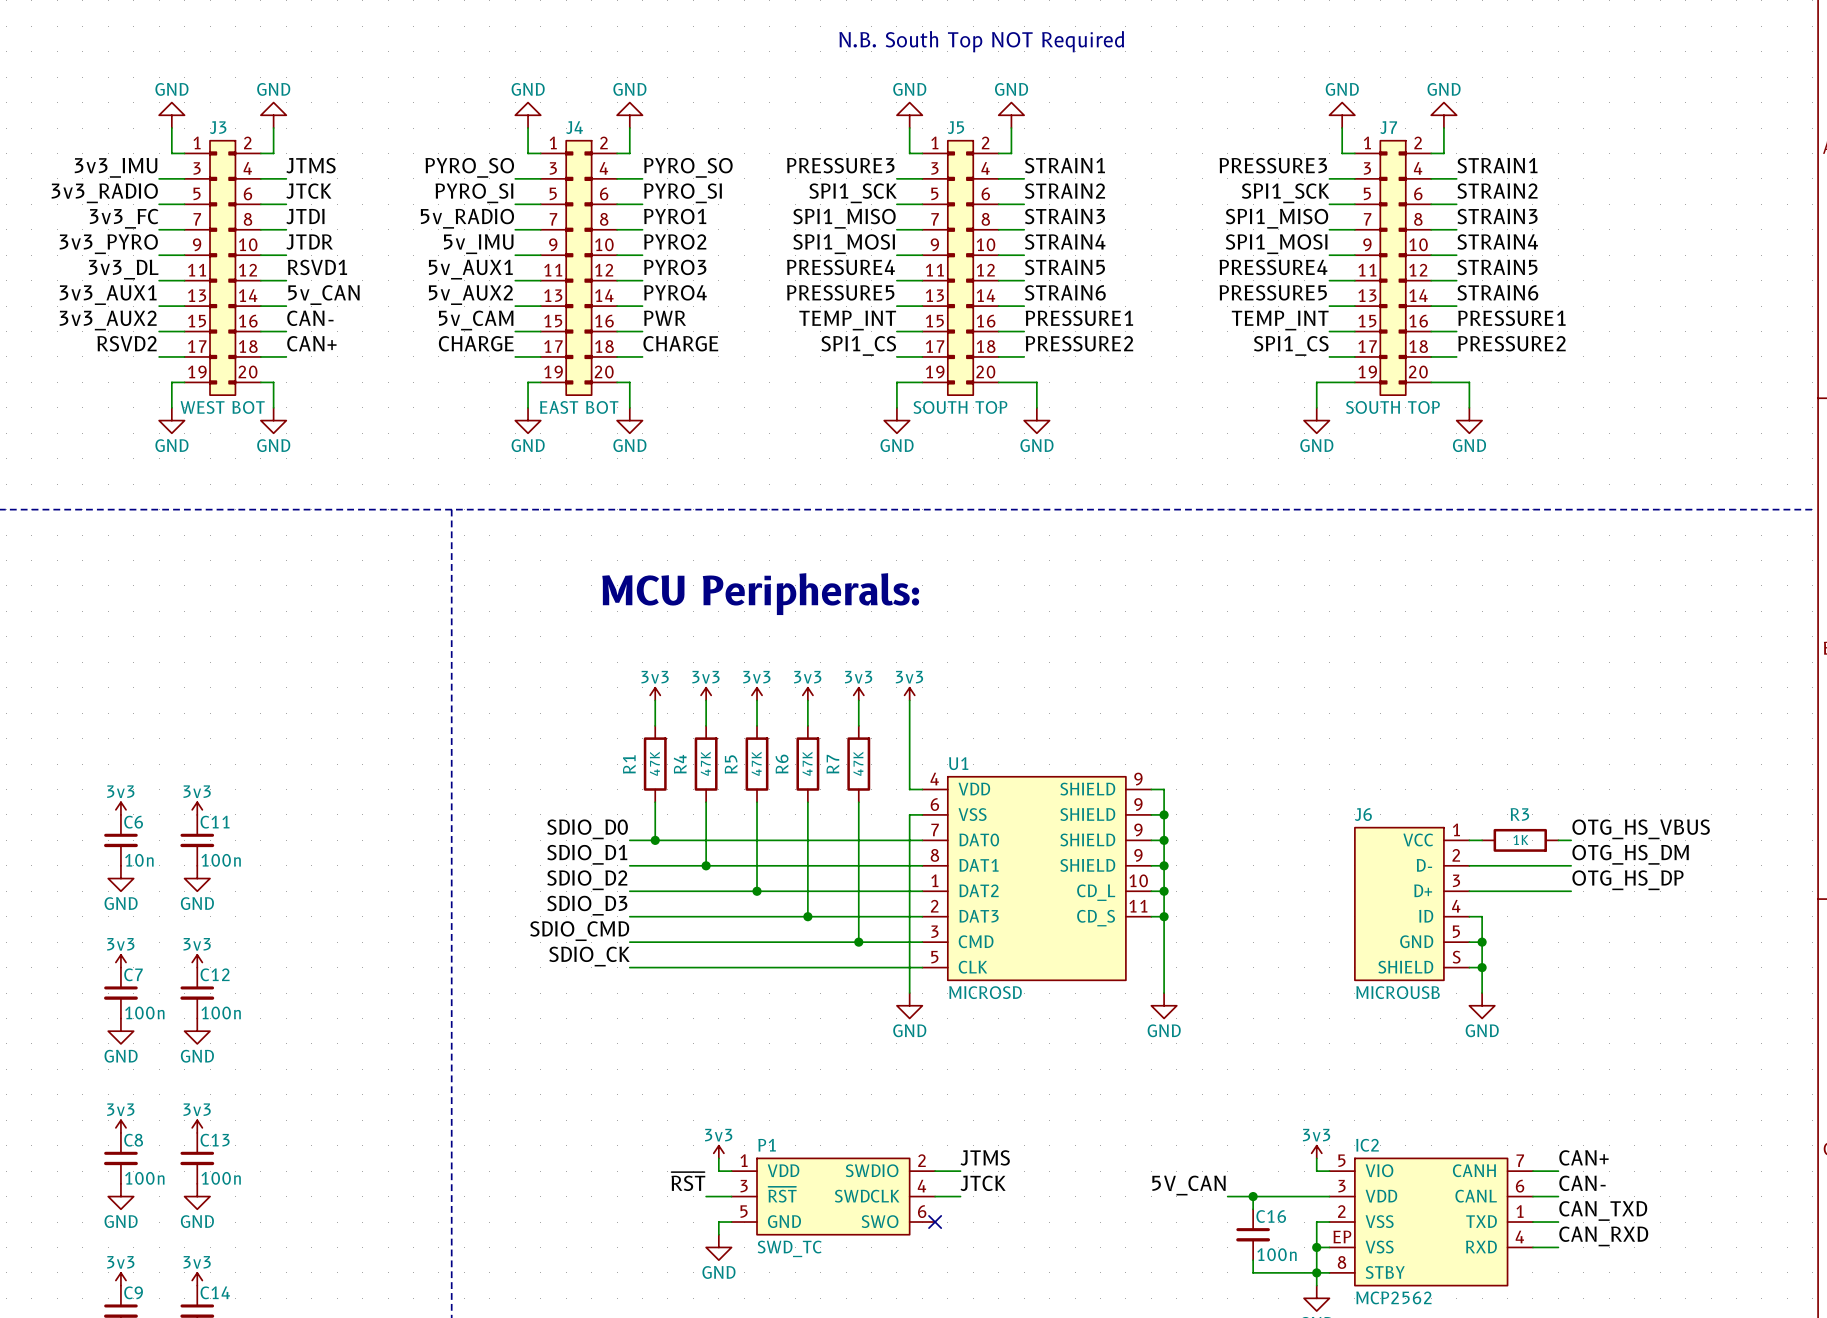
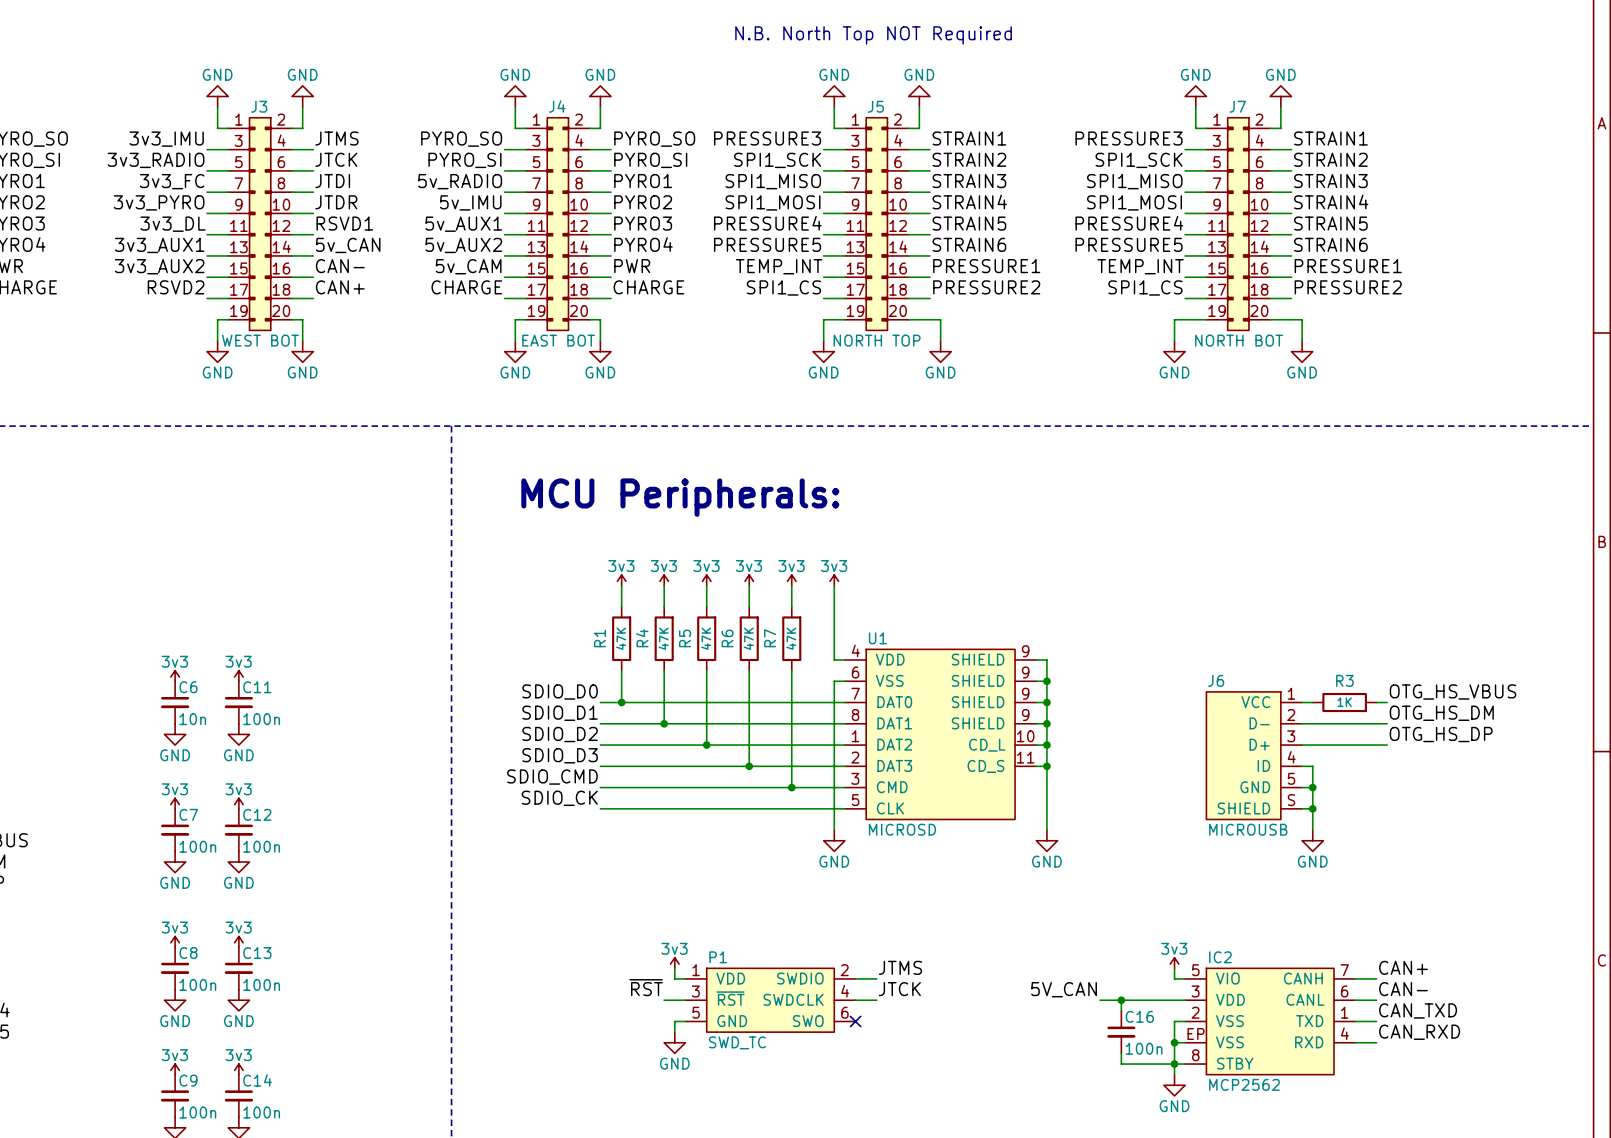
text: N.B. South Top NOT Required (981, 41) -> N.B. North Top NOT Required (873, 35)
J5 value: SOUTH TOP (960, 407) -> NORTH TOP (877, 340)
J7 value: SOUTH TOP (1392, 407) -> NORTH BOT (1239, 340)

